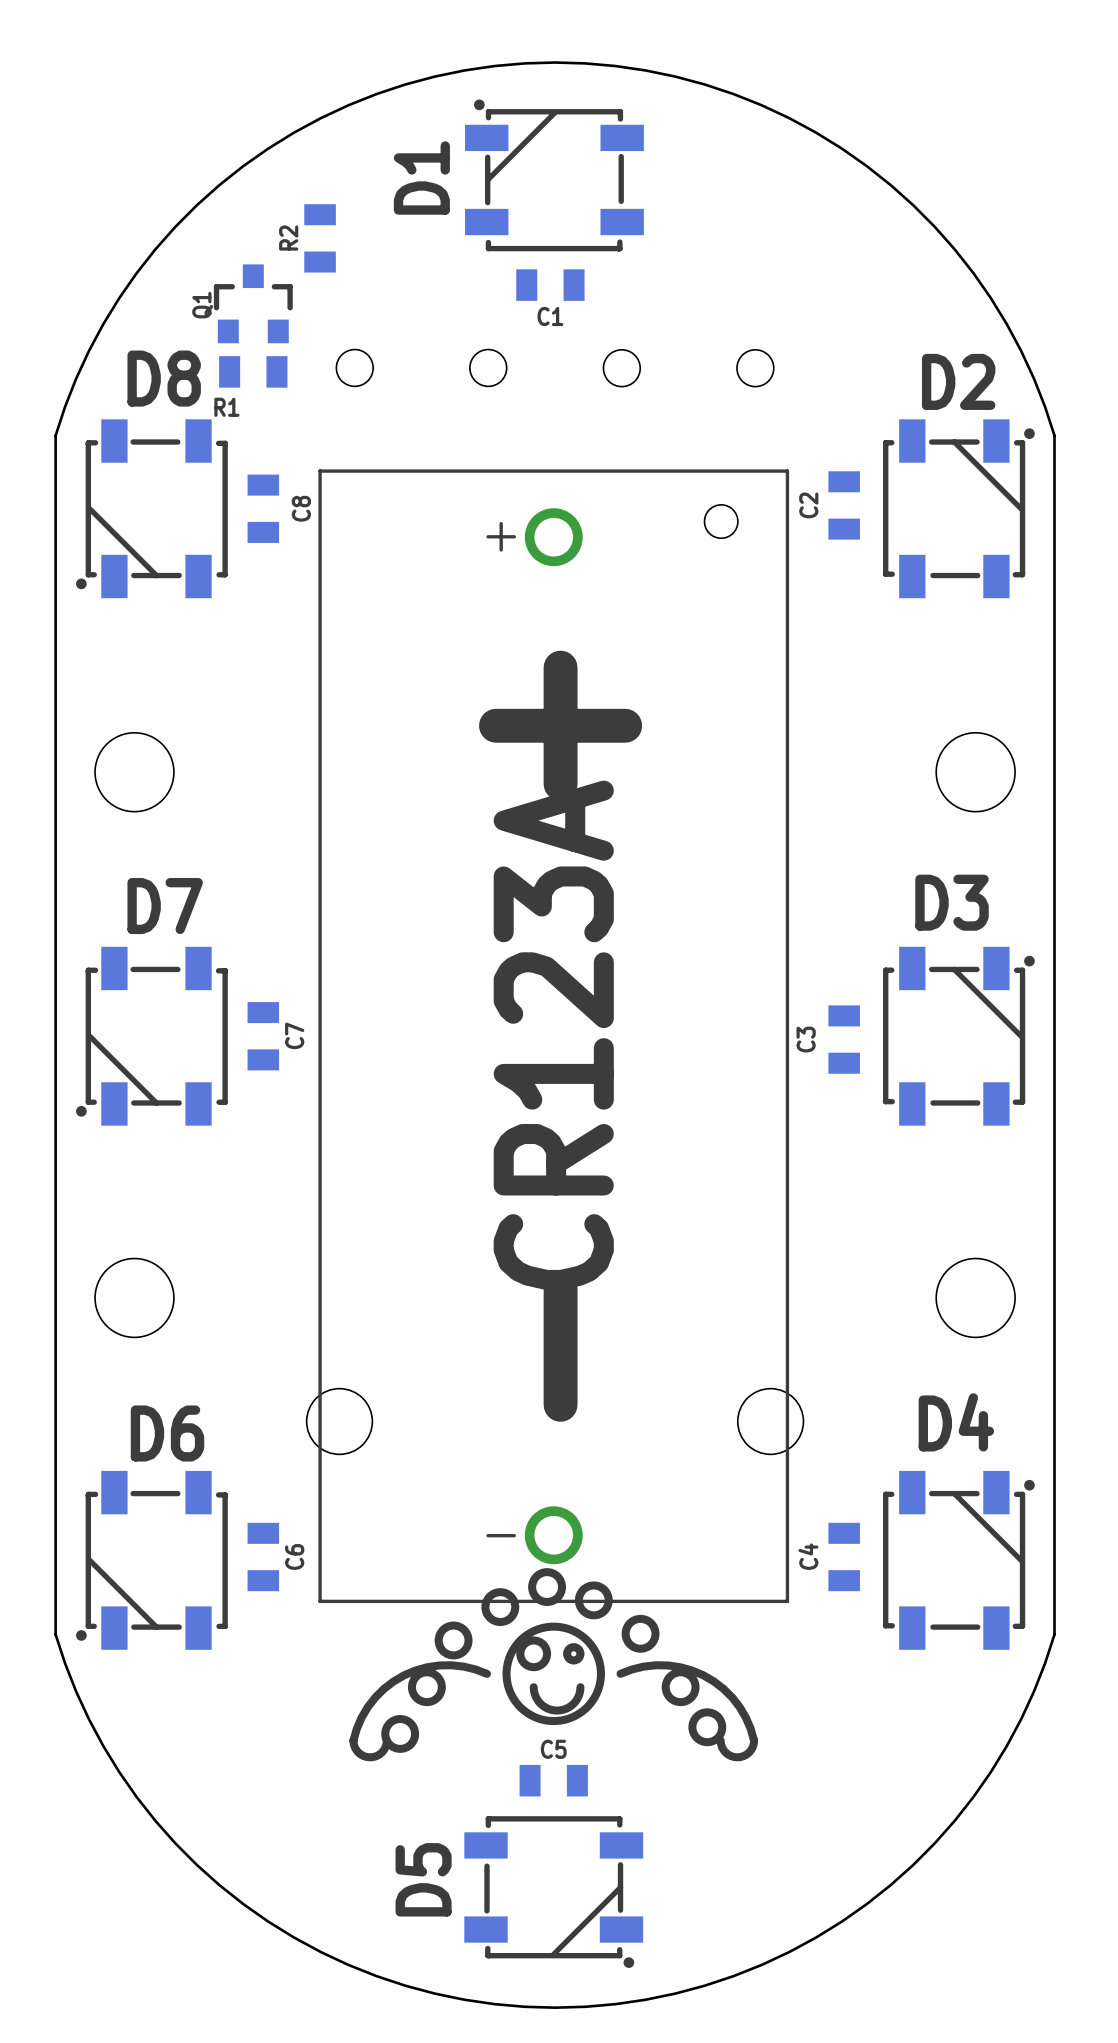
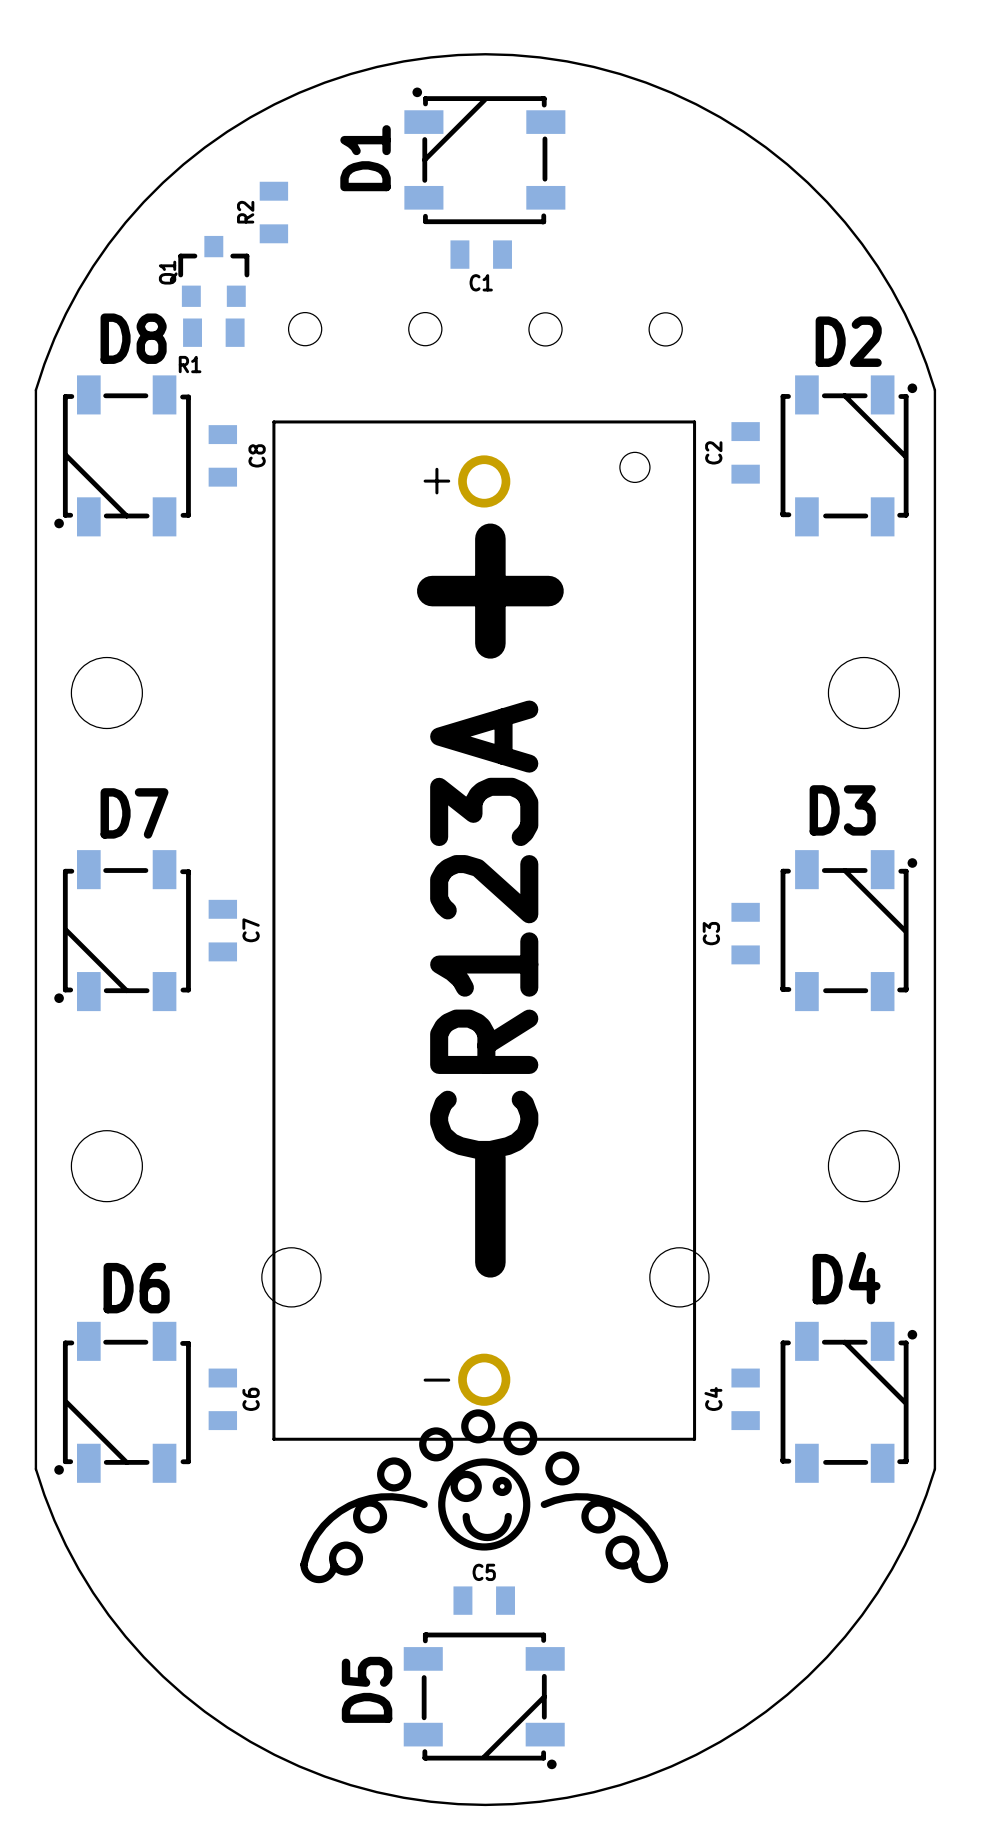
text position: + (560, 725) -> + (490, 591)

